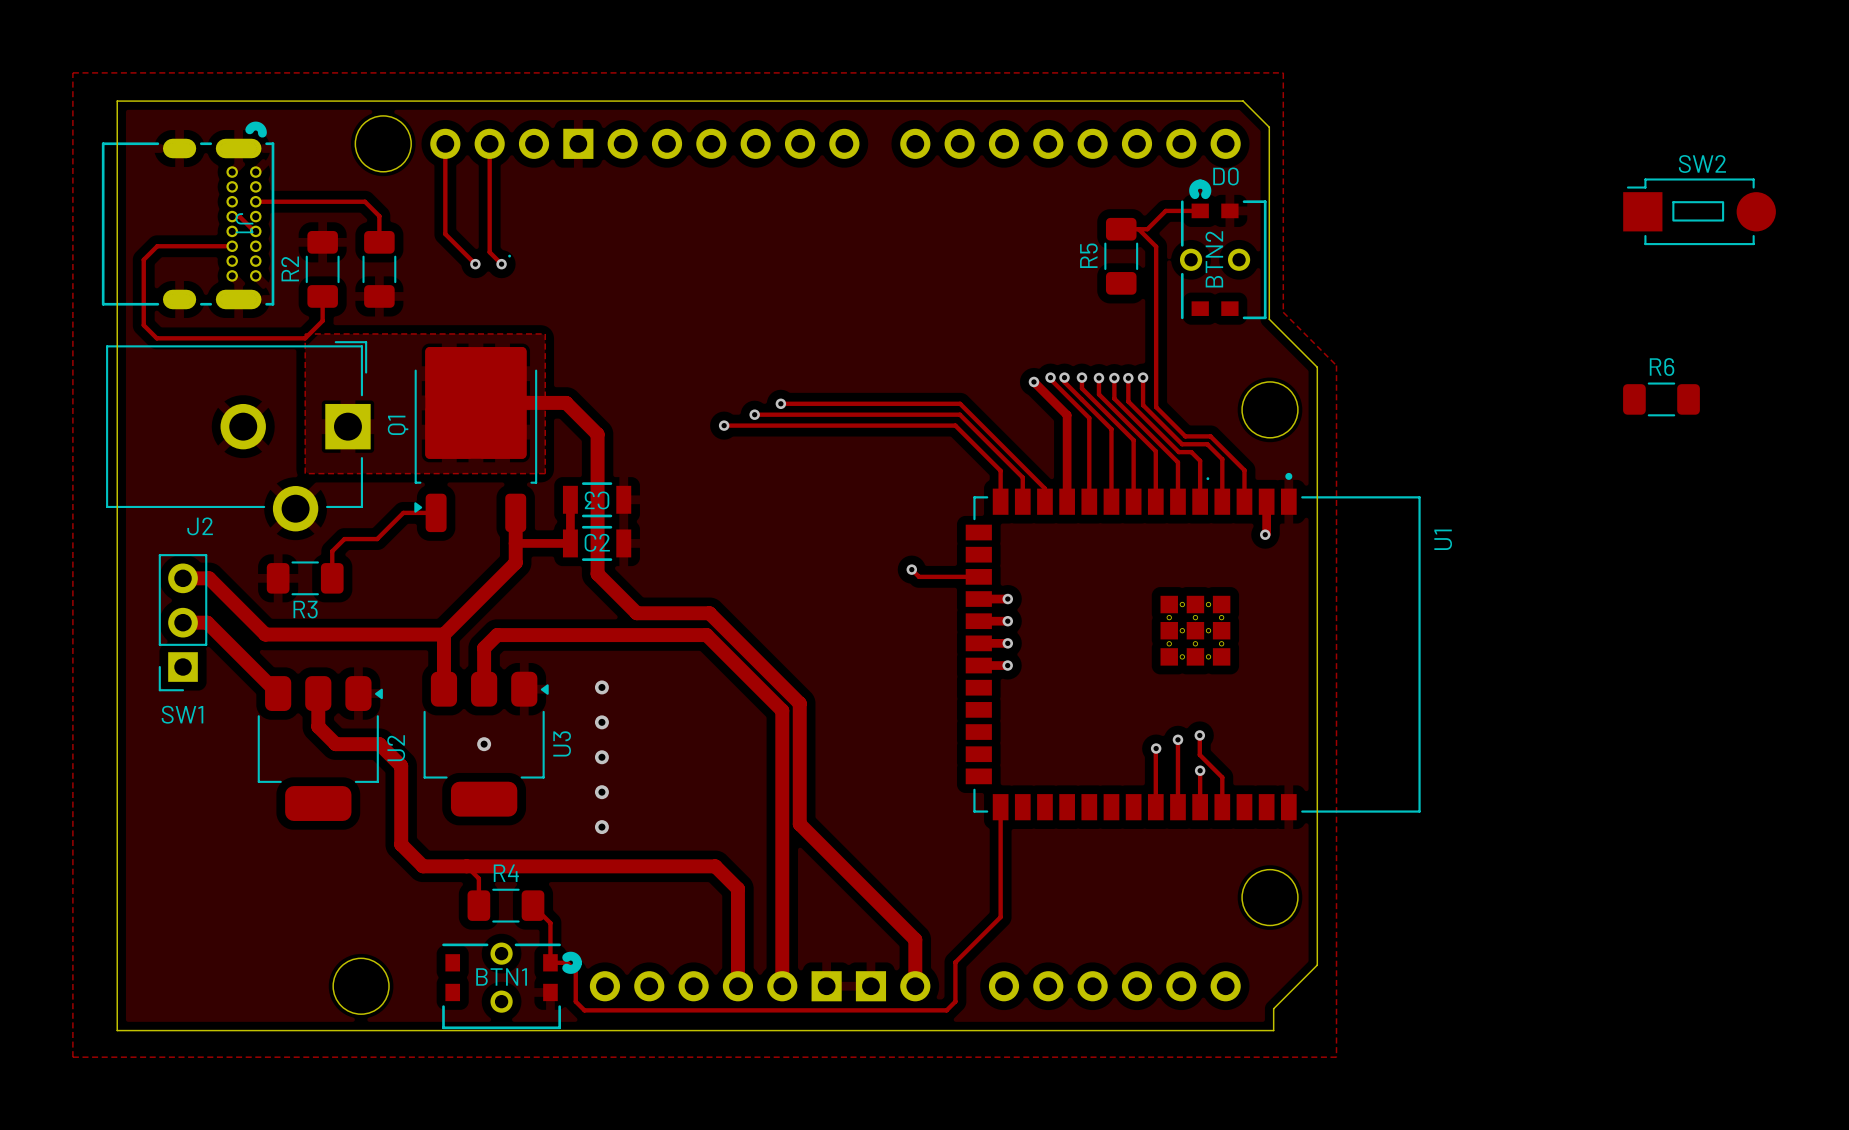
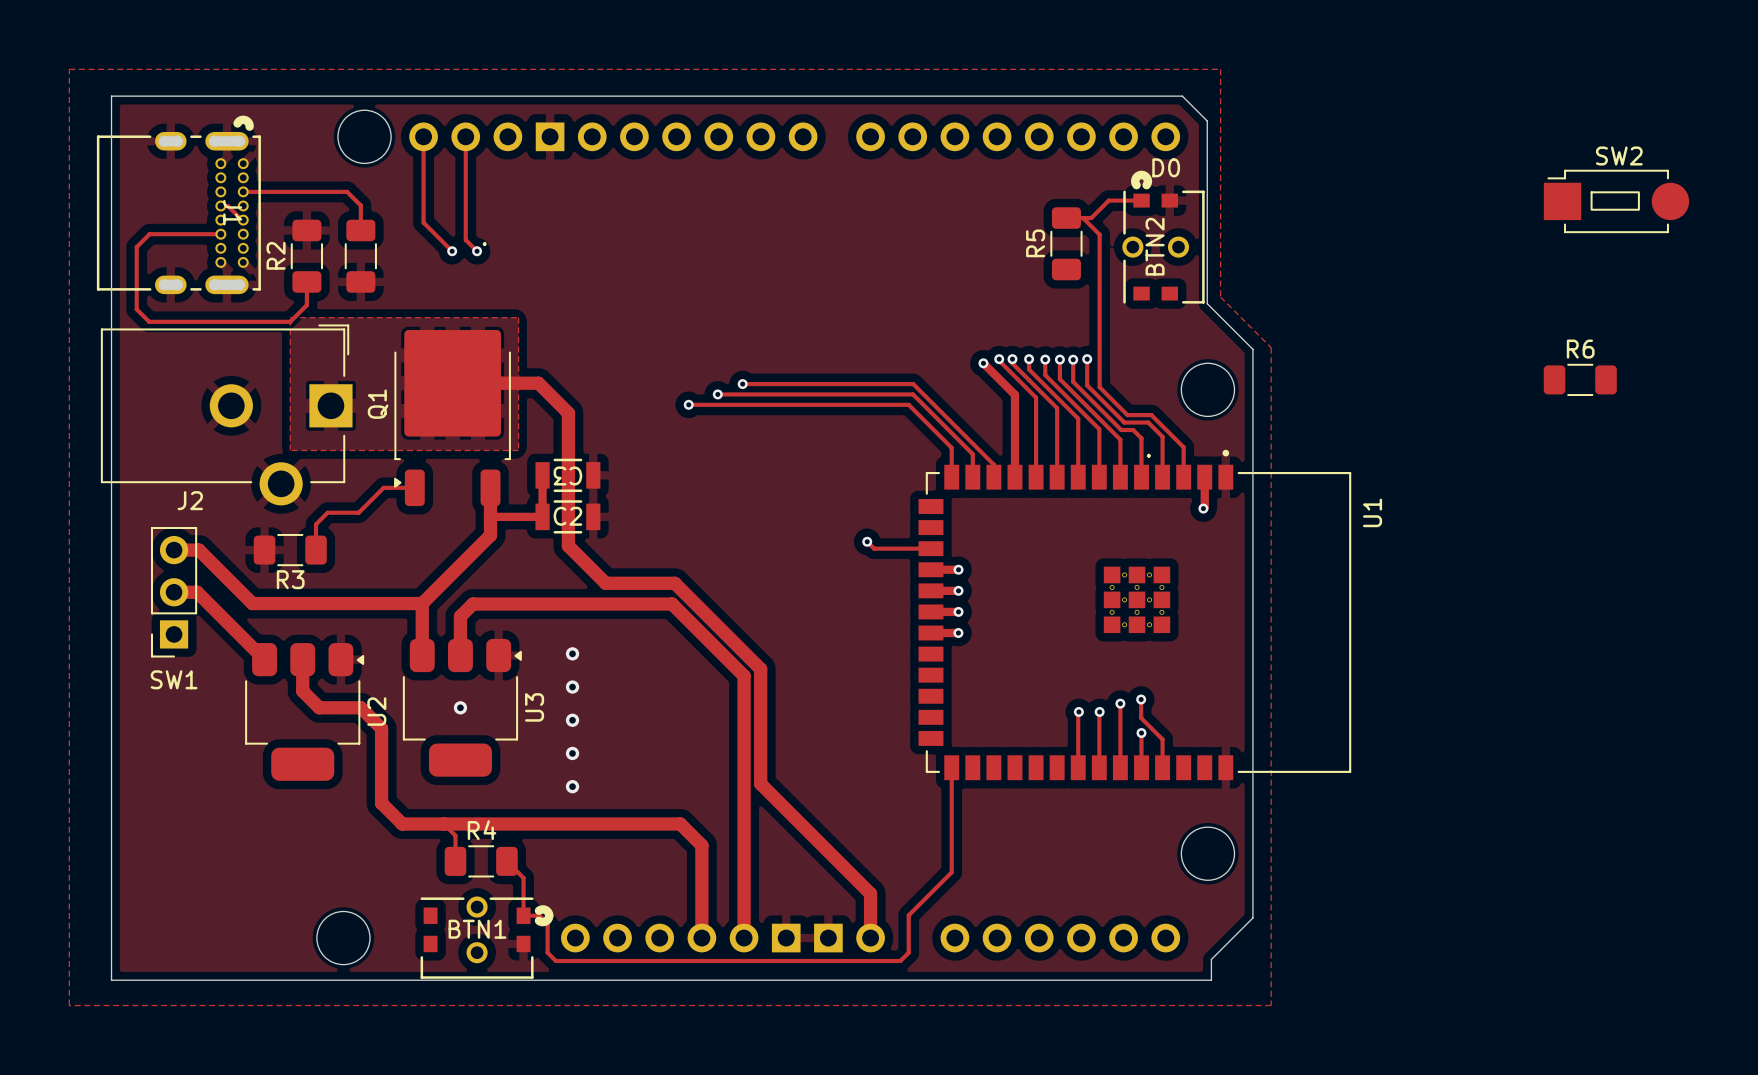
track: none -> (1078, 711) (1078, 767)
via: none -> (1078, 711)

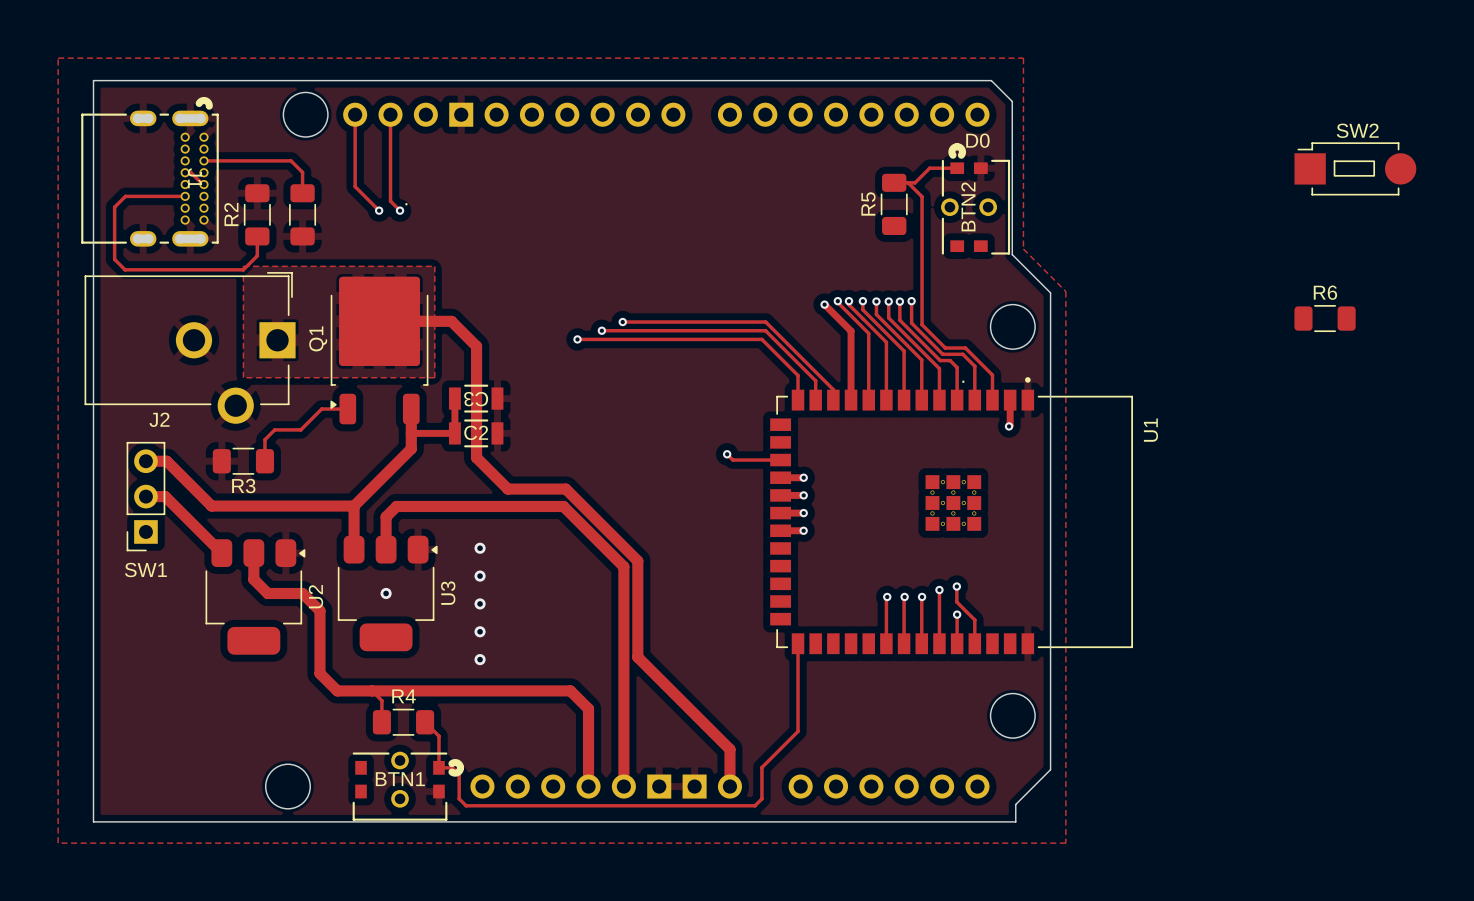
track: none -> (887, 596) (886, 643)
via: none -> (887, 596)

